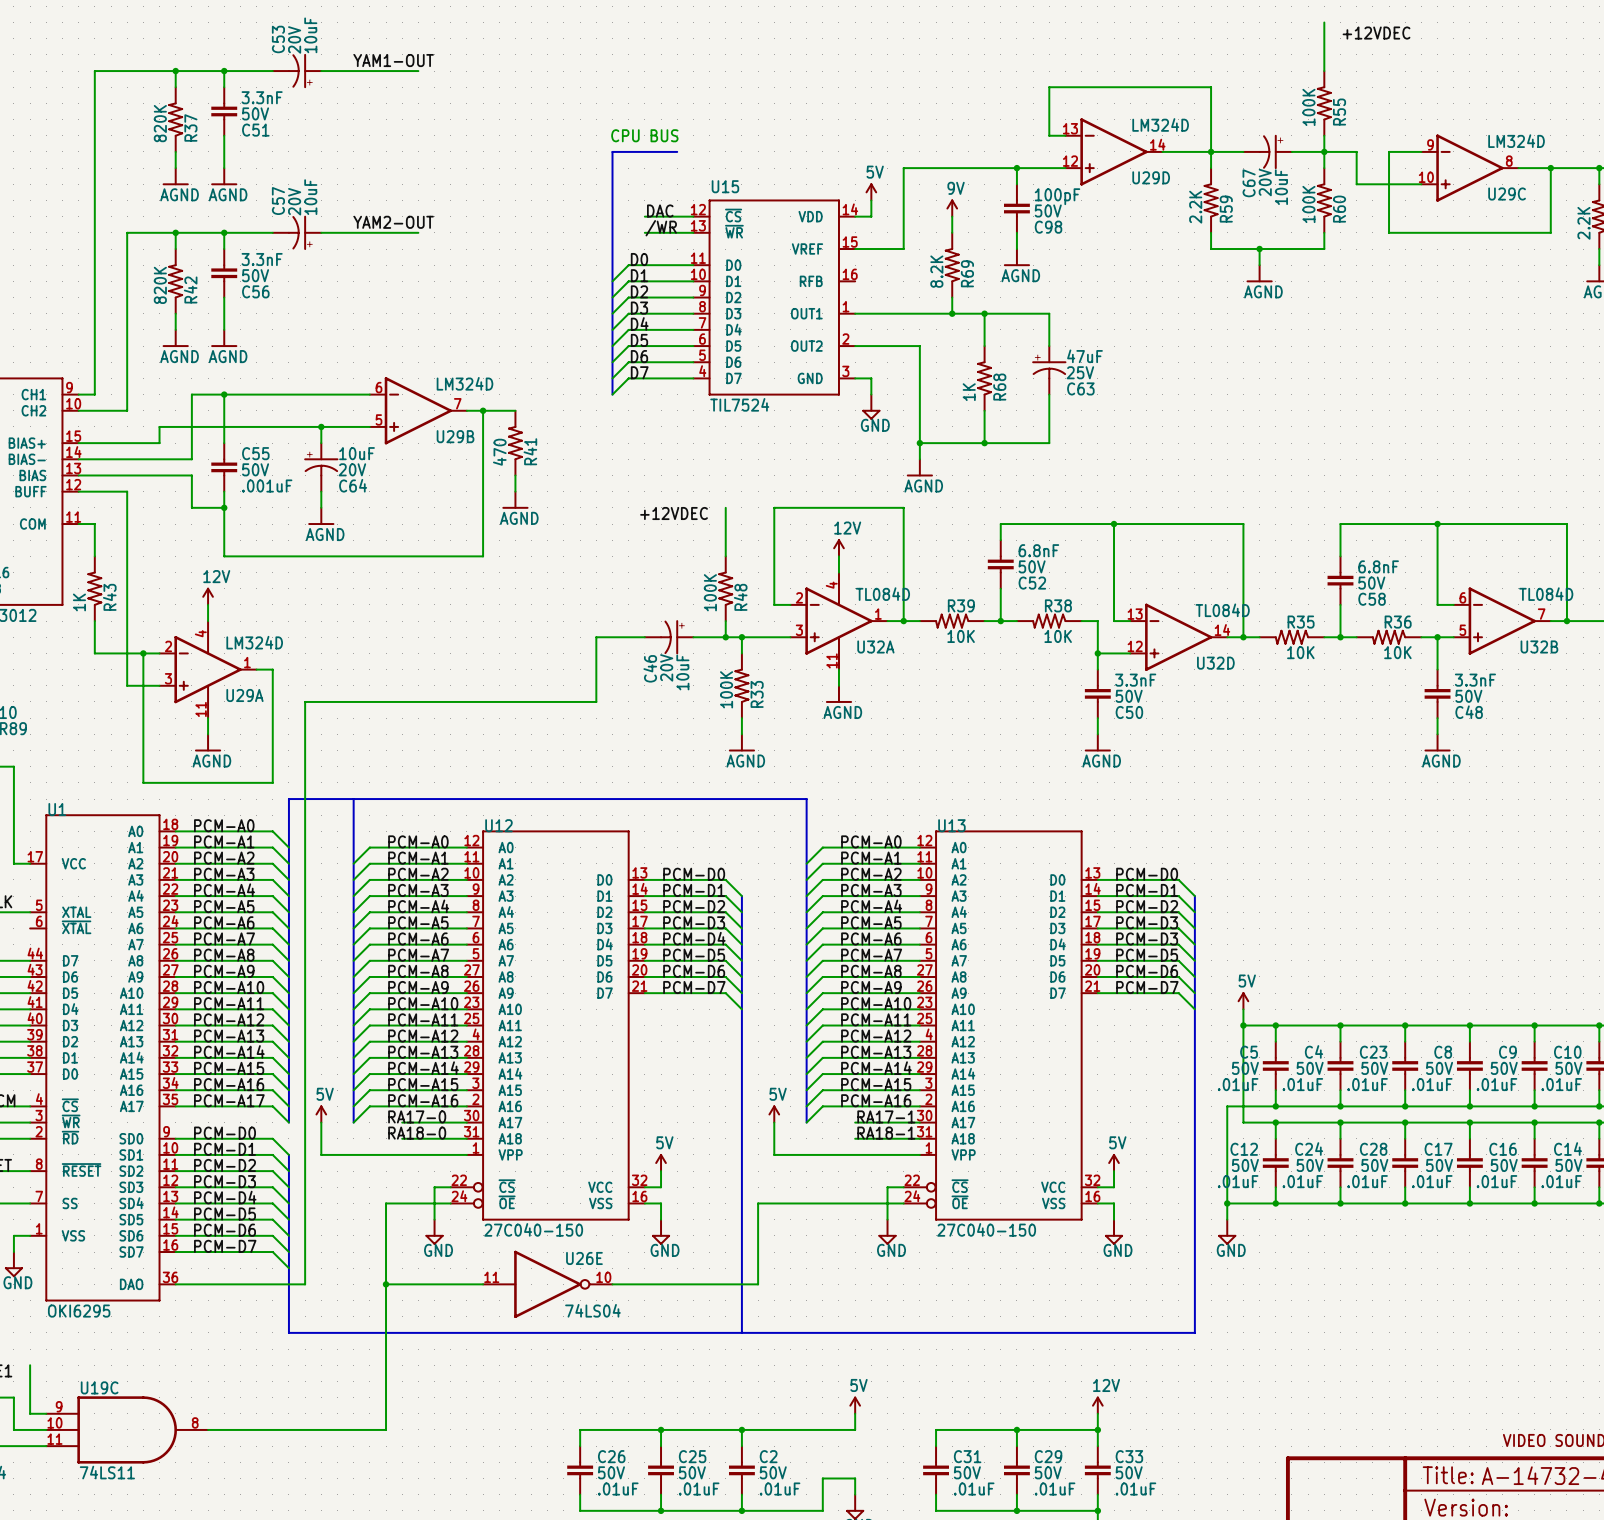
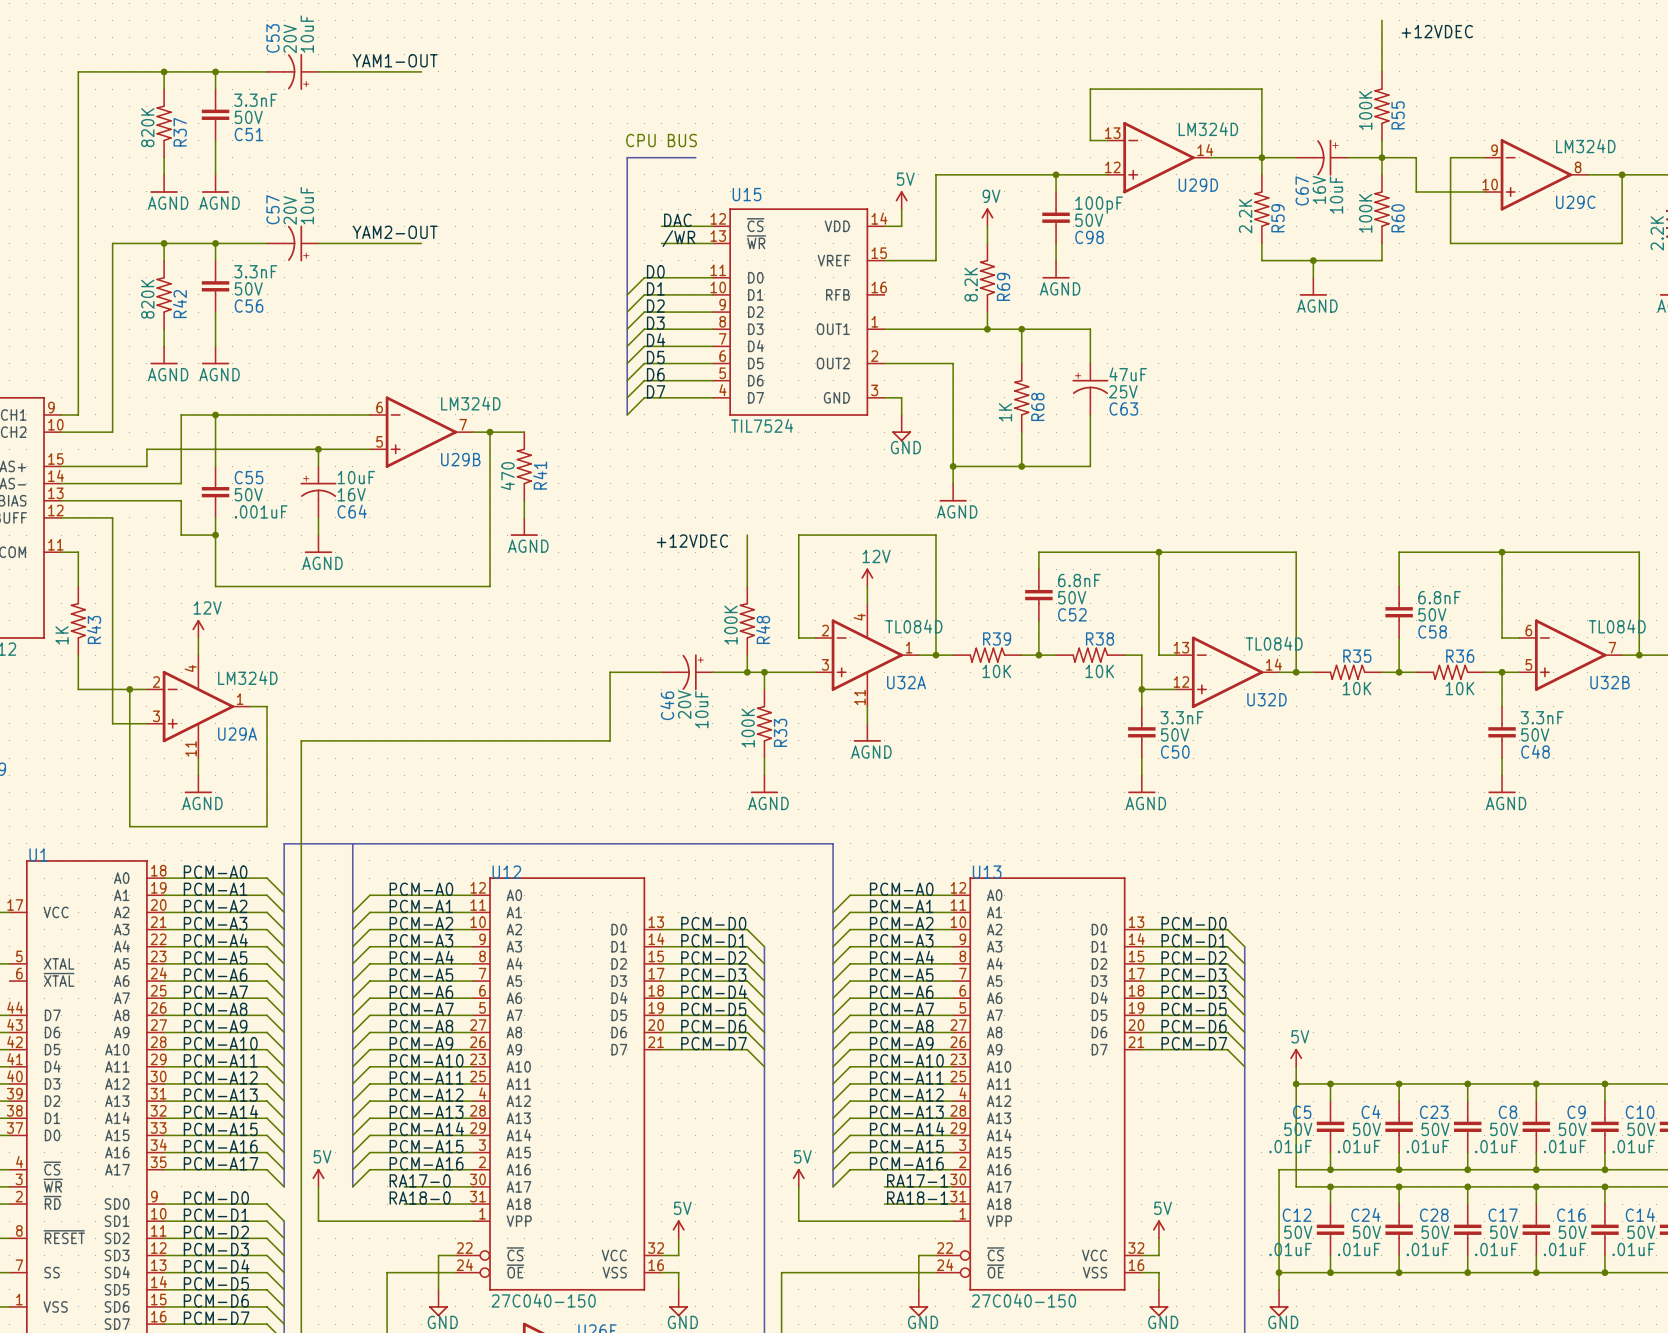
C67 text: 20V (1265, 182) -> 16V (1319, 189)
C64 text: 20V (352, 469) -> 16V (351, 494)

